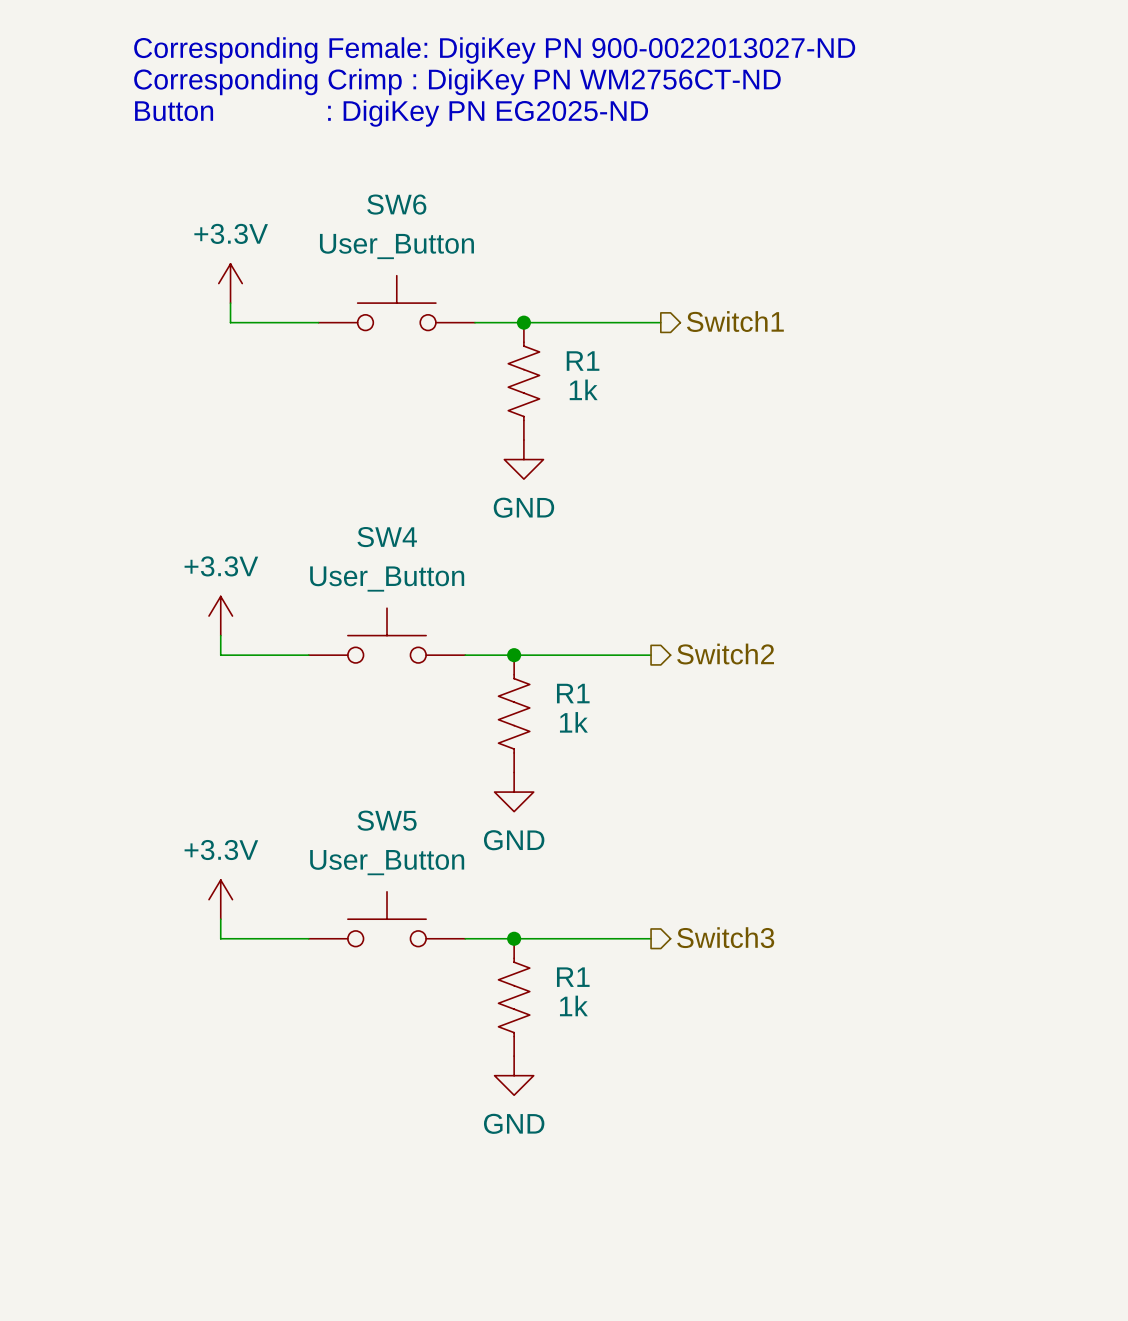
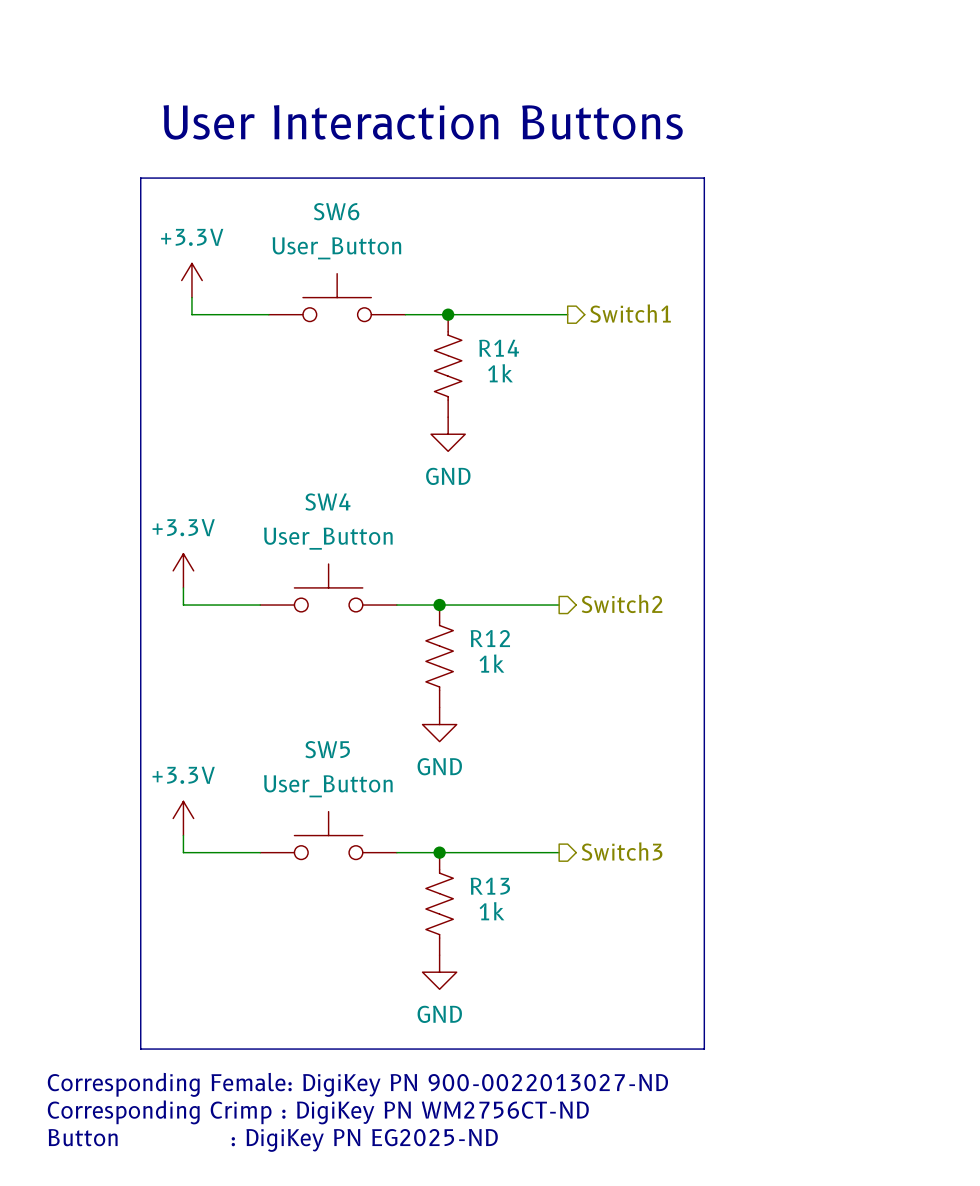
text: Corresponding Female: DigiKey PN 900-0022013027-ND (494, 50) -> none
text: Corresponding Crimp : DigiKey PN WM2756CT-ND (457, 81) -> none
text: none -> User Interaction Buttons (423, 122)
text: Button : DigiKey PN EG2025-ND (391, 113) -> none
line: none -> (140, 178) (704, 178) (704, 1049) (140, 1049) (140, 178)
R1 name: R1 (583, 361) -> R14 (499, 348)
R1 name: R1 (573, 693) -> R12 (490, 638)
R1 name: R1 (573, 977) -> R13 (490, 886)
text: none -> Corresponding Female: DigiKey PN 900-0022013027-ND (357, 1084)
text: none -> Corresponding Crimp : DigiKey PN WM2756CT-ND (318, 1112)
text: none -> Button : DigiKey PN EG2025-ND (273, 1140)

